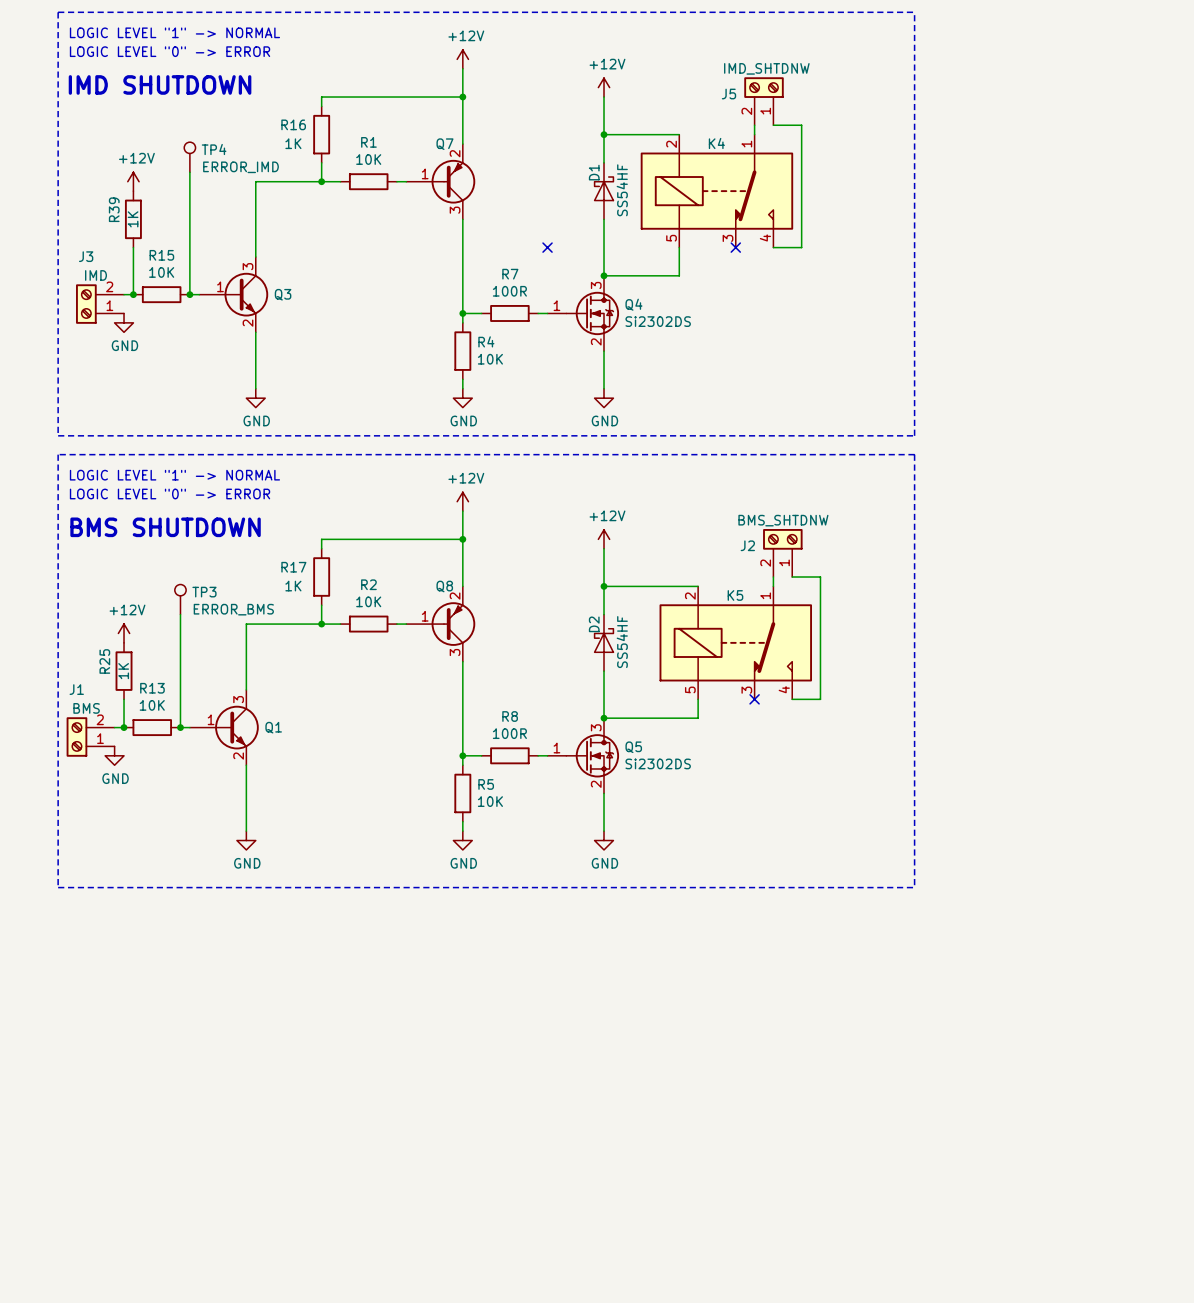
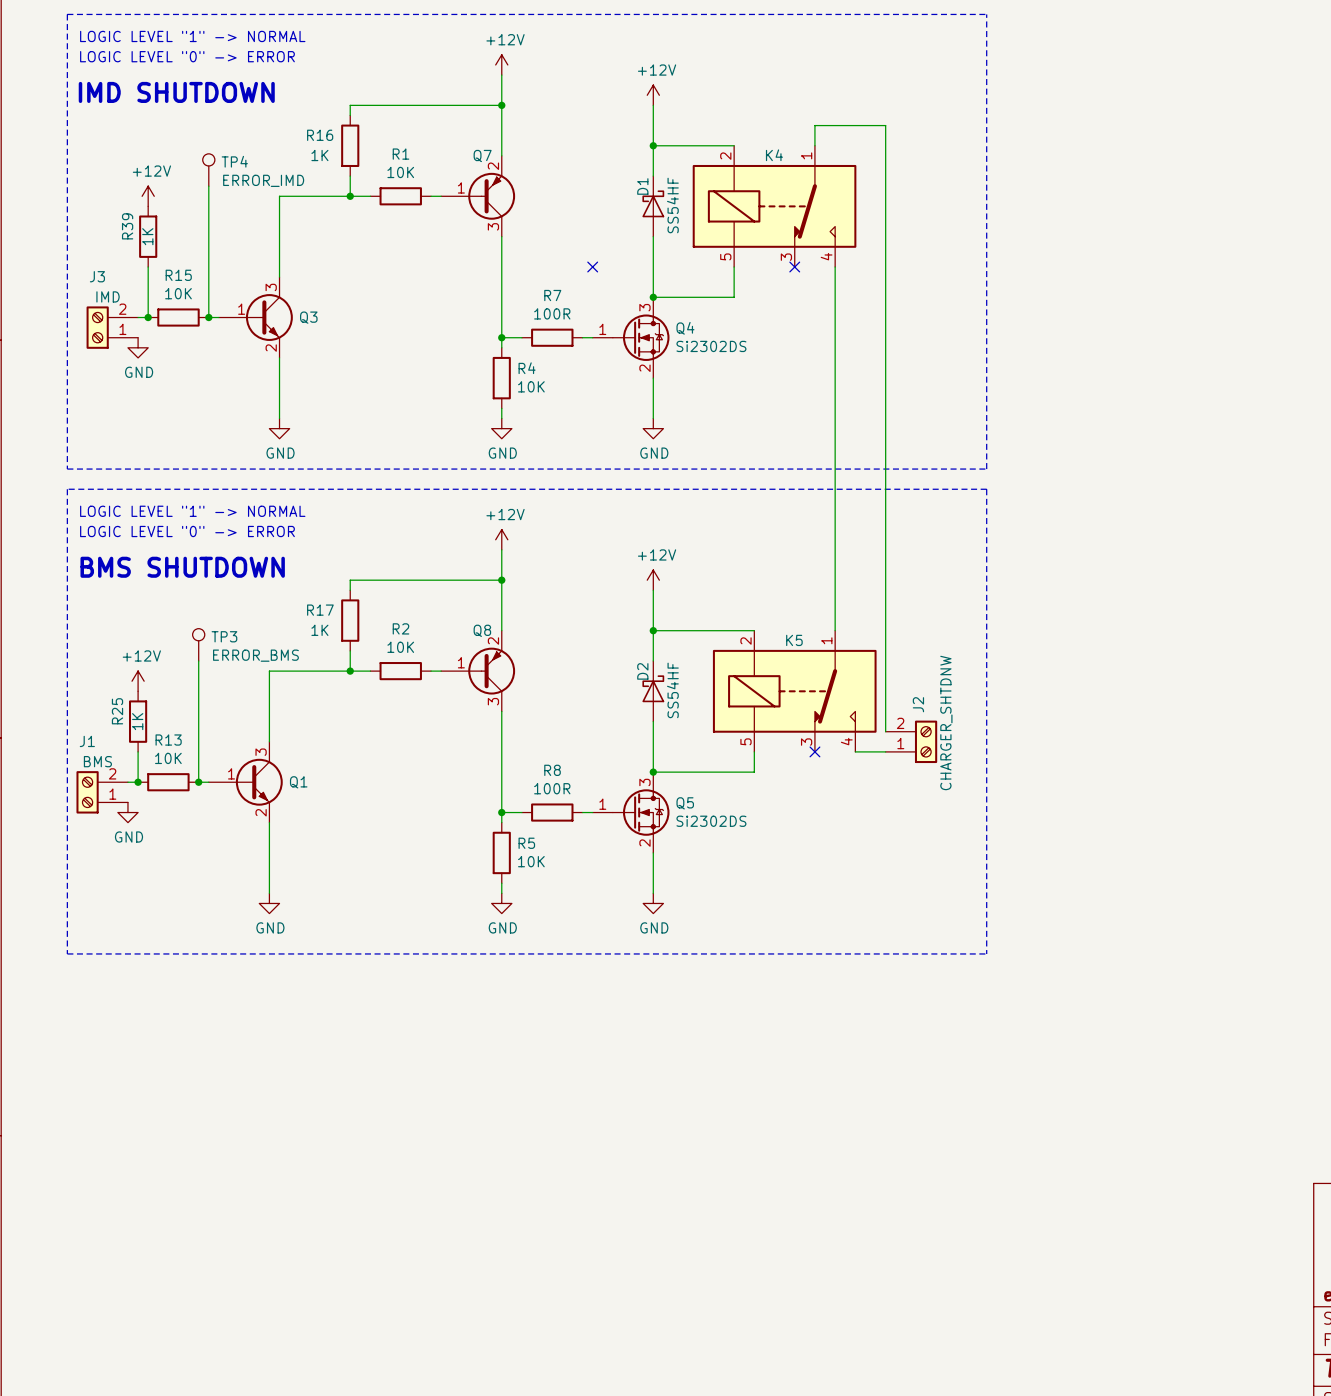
J5: IMD_SHTDNW (764, 101) -> none
wire: (773, 125) (801, 125) (801, 247) (773, 247) -> (835, 620) (835, 267)
J2 value: BMS_SHTDNW (783, 520) -> CHARGER_SHTDNW (946, 722)
J2 rotation: 0° (782, 539) -> 90° clockwise (926, 741)
J2 position: (782, 553) -> (911, 741)
wire: (792, 577) (820, 577) -> (814, 135) (814, 125) (885, 125) (885, 620)
wire: (820, 680) (820, 699) -> none

